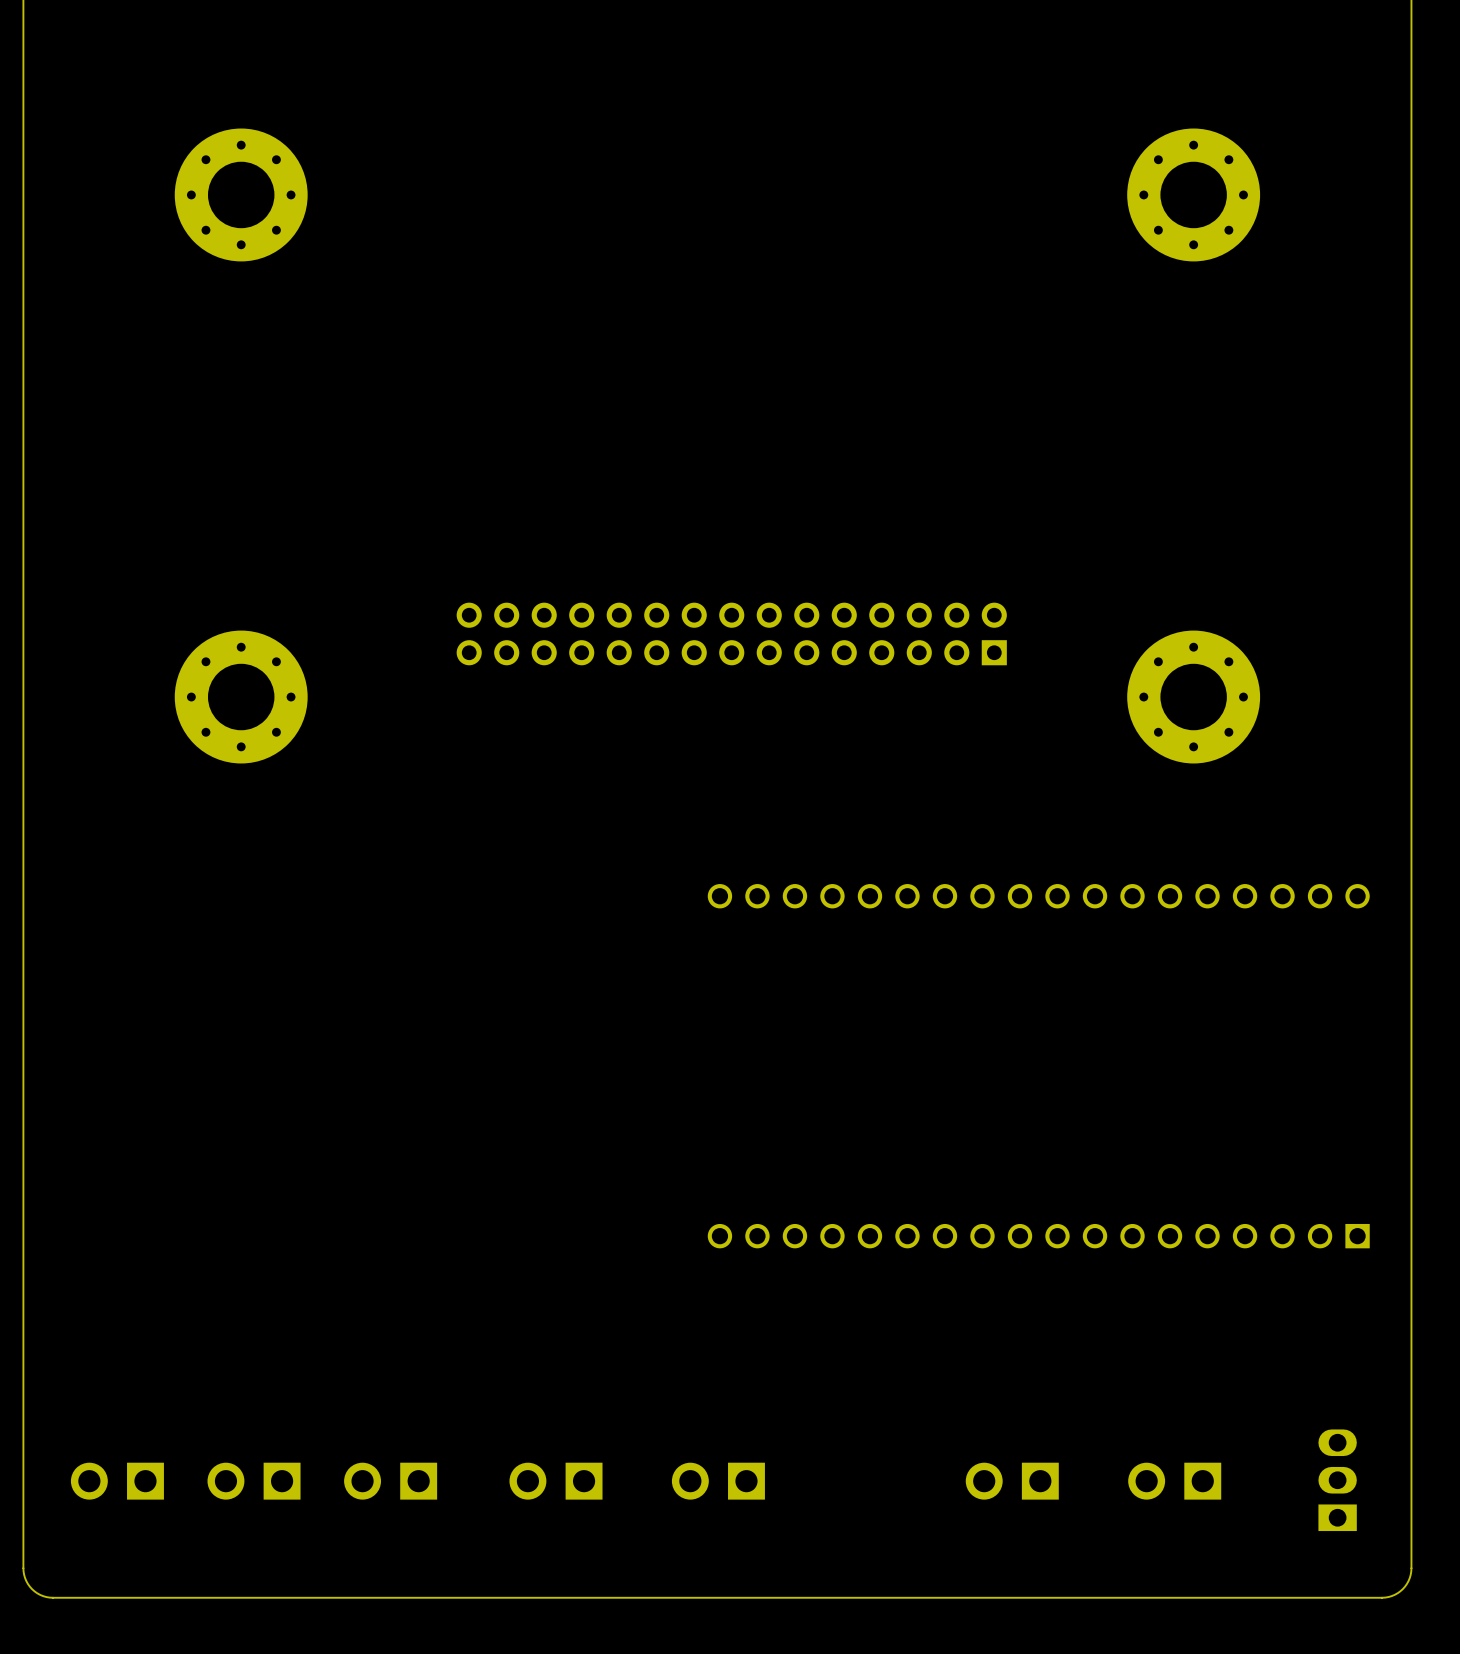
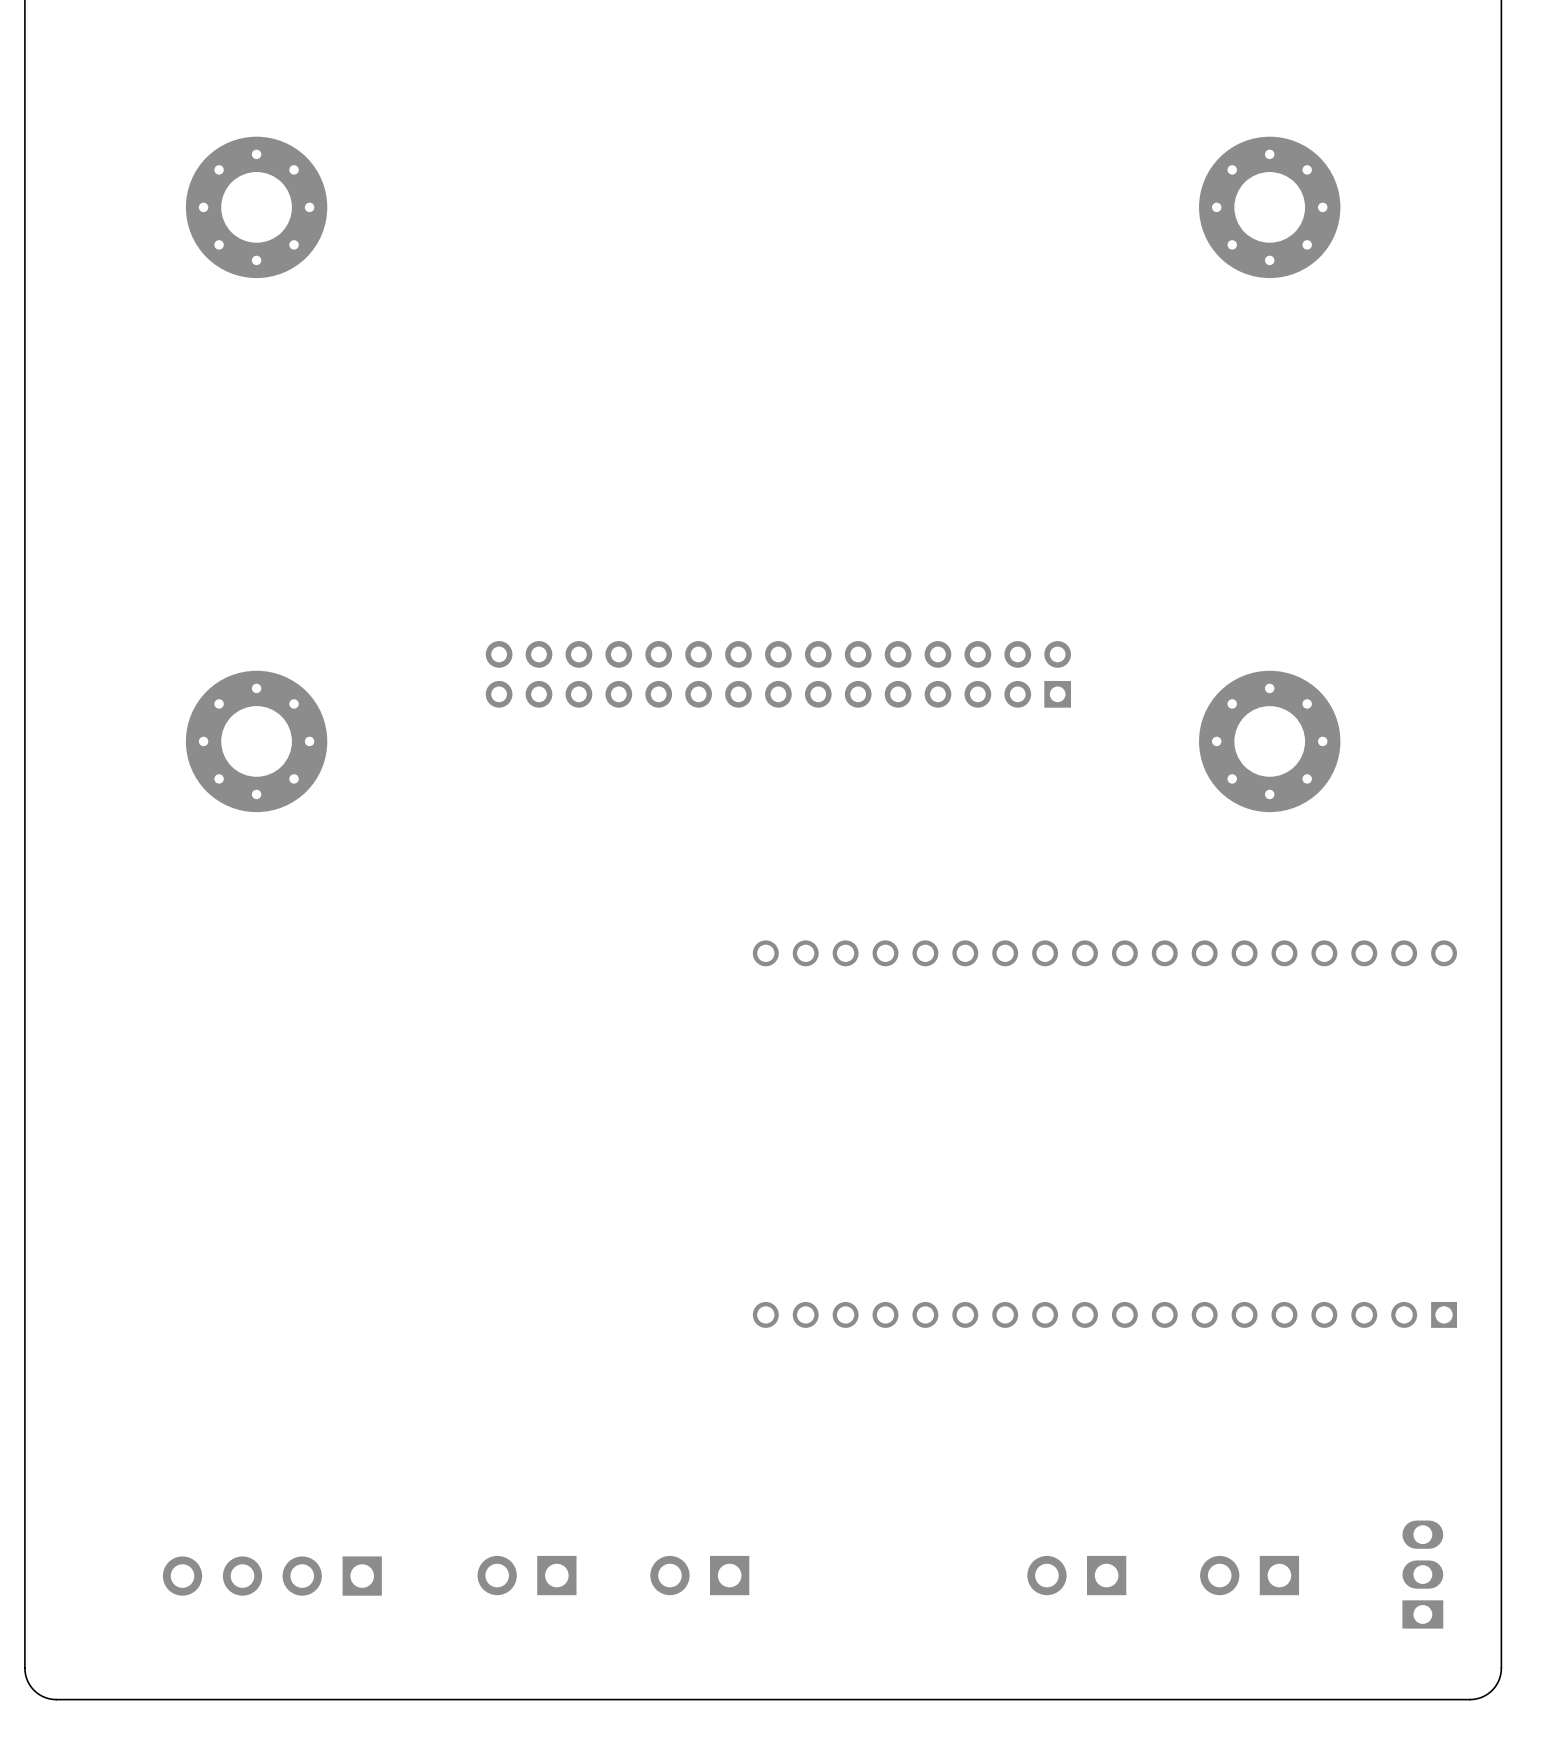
part footprint: [207, 1462, 301, 1500] -> [162, 1556, 382, 1596]
part: (117, 1481) -> none
part: (390, 1481) -> none
part: none -> (527, 1575)
part: (555, 1481) -> none
part: none -> (699, 1575)
part: (718, 1481) -> none

